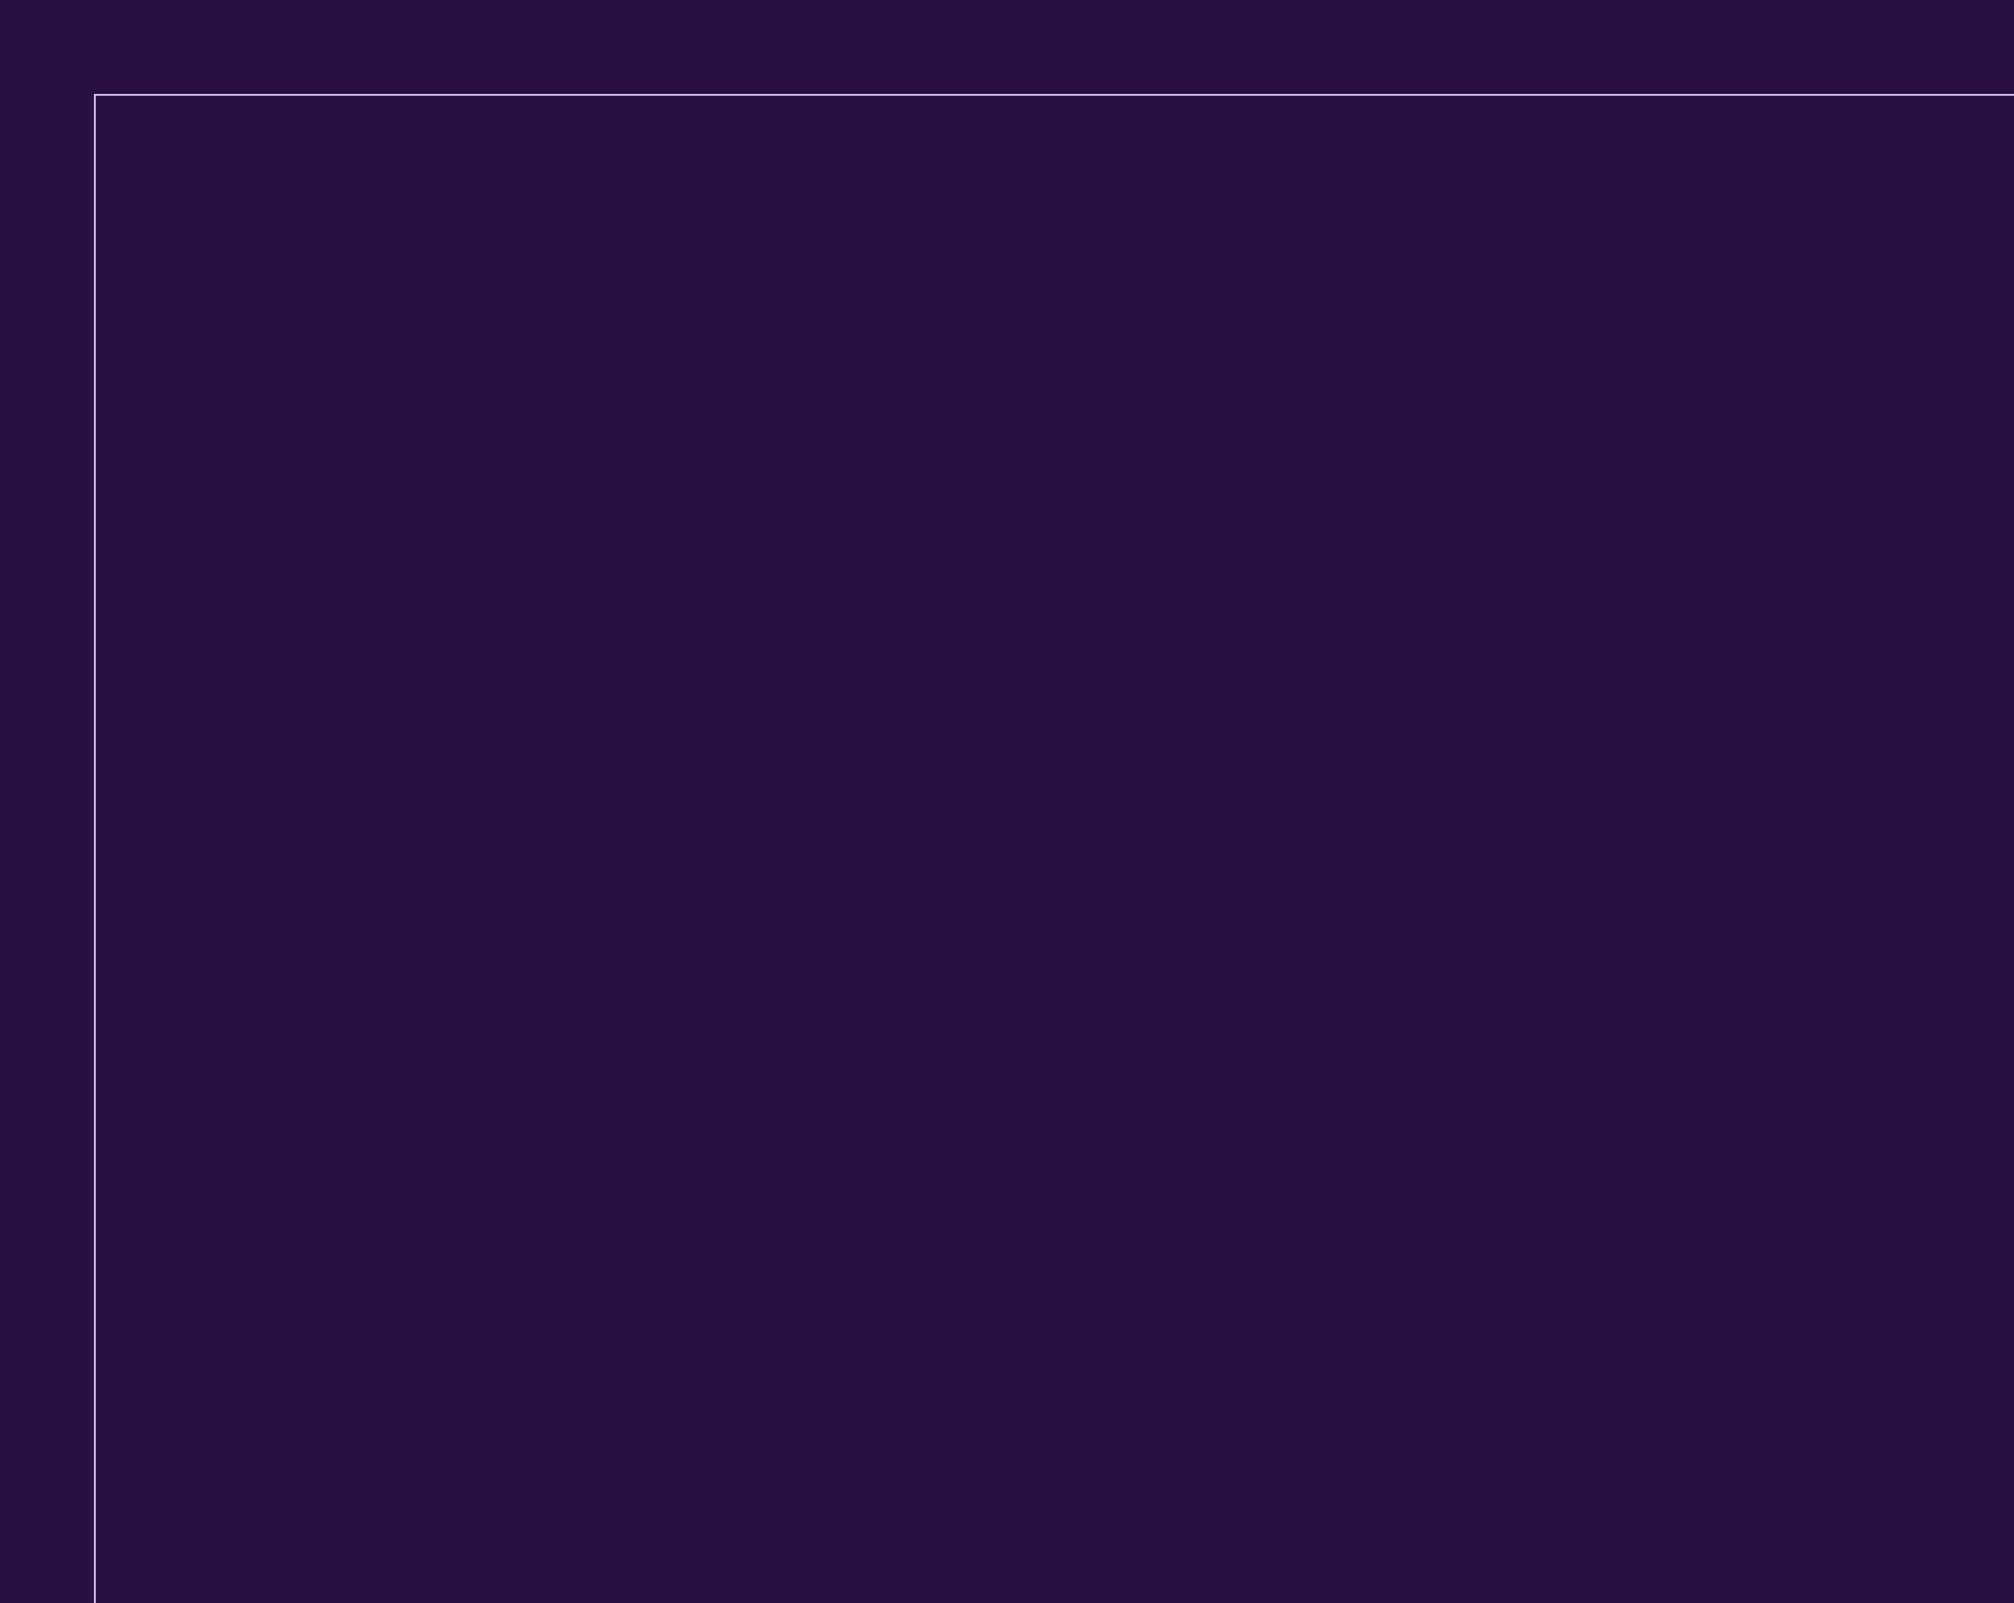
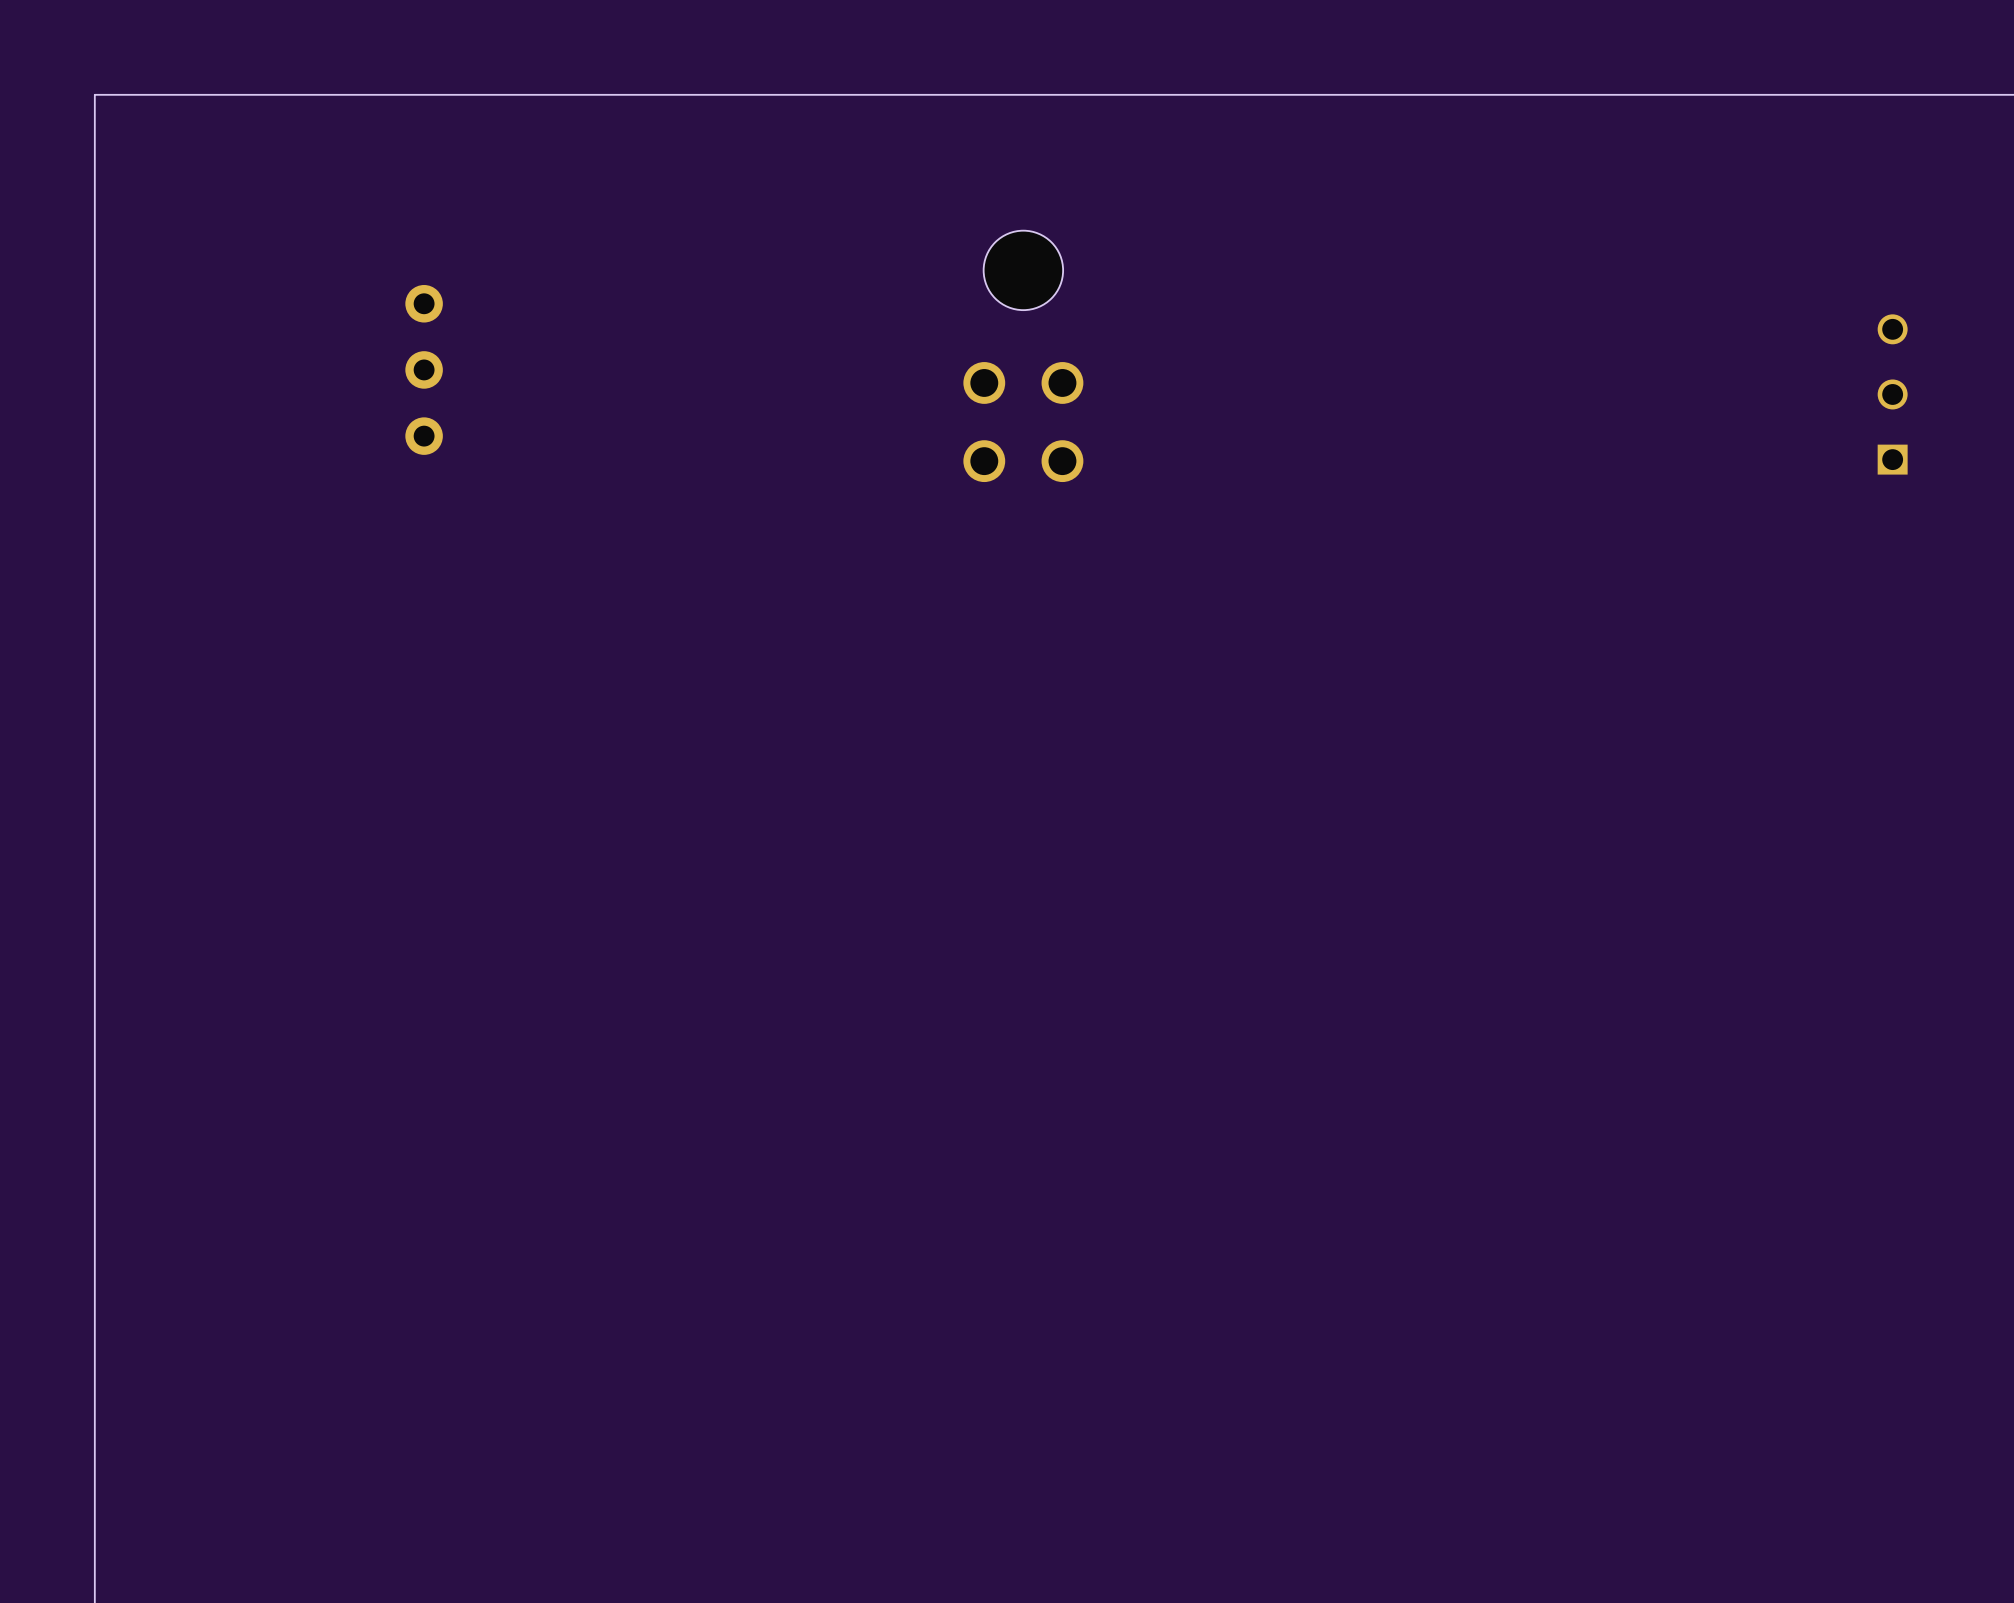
part: none -> (1023, 356)
part: none -> (424, 369)
part: none -> (1892, 394)

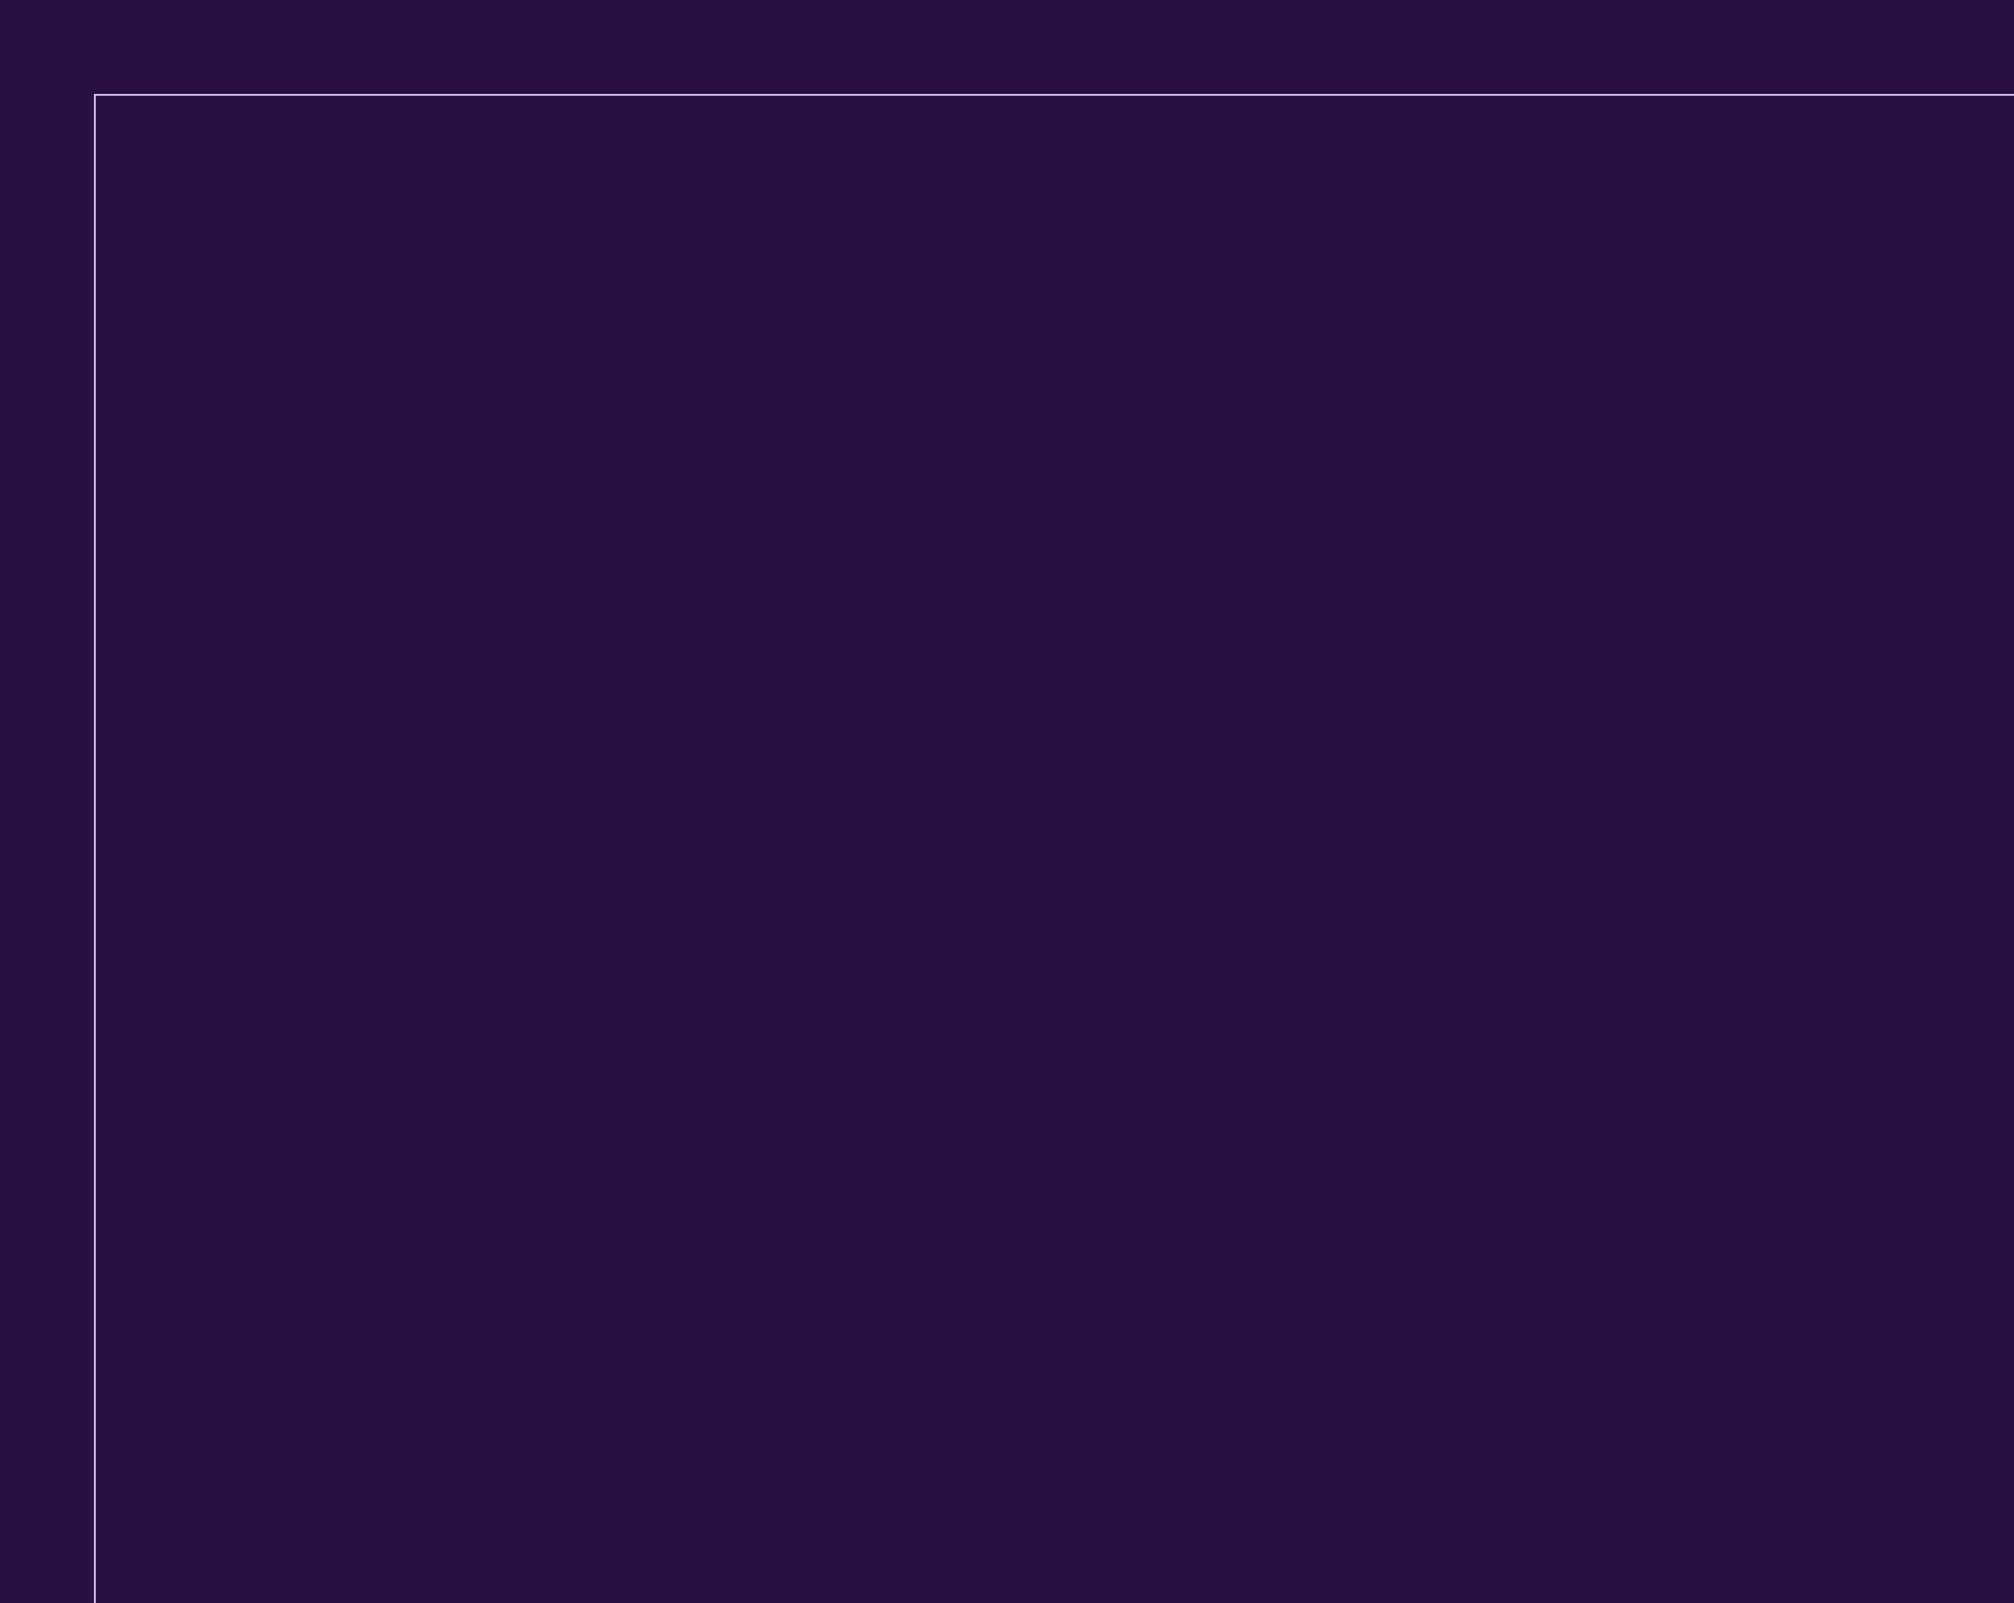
part: (1023, 356) -> none
part: (424, 369) -> none
part: (1892, 394) -> none

